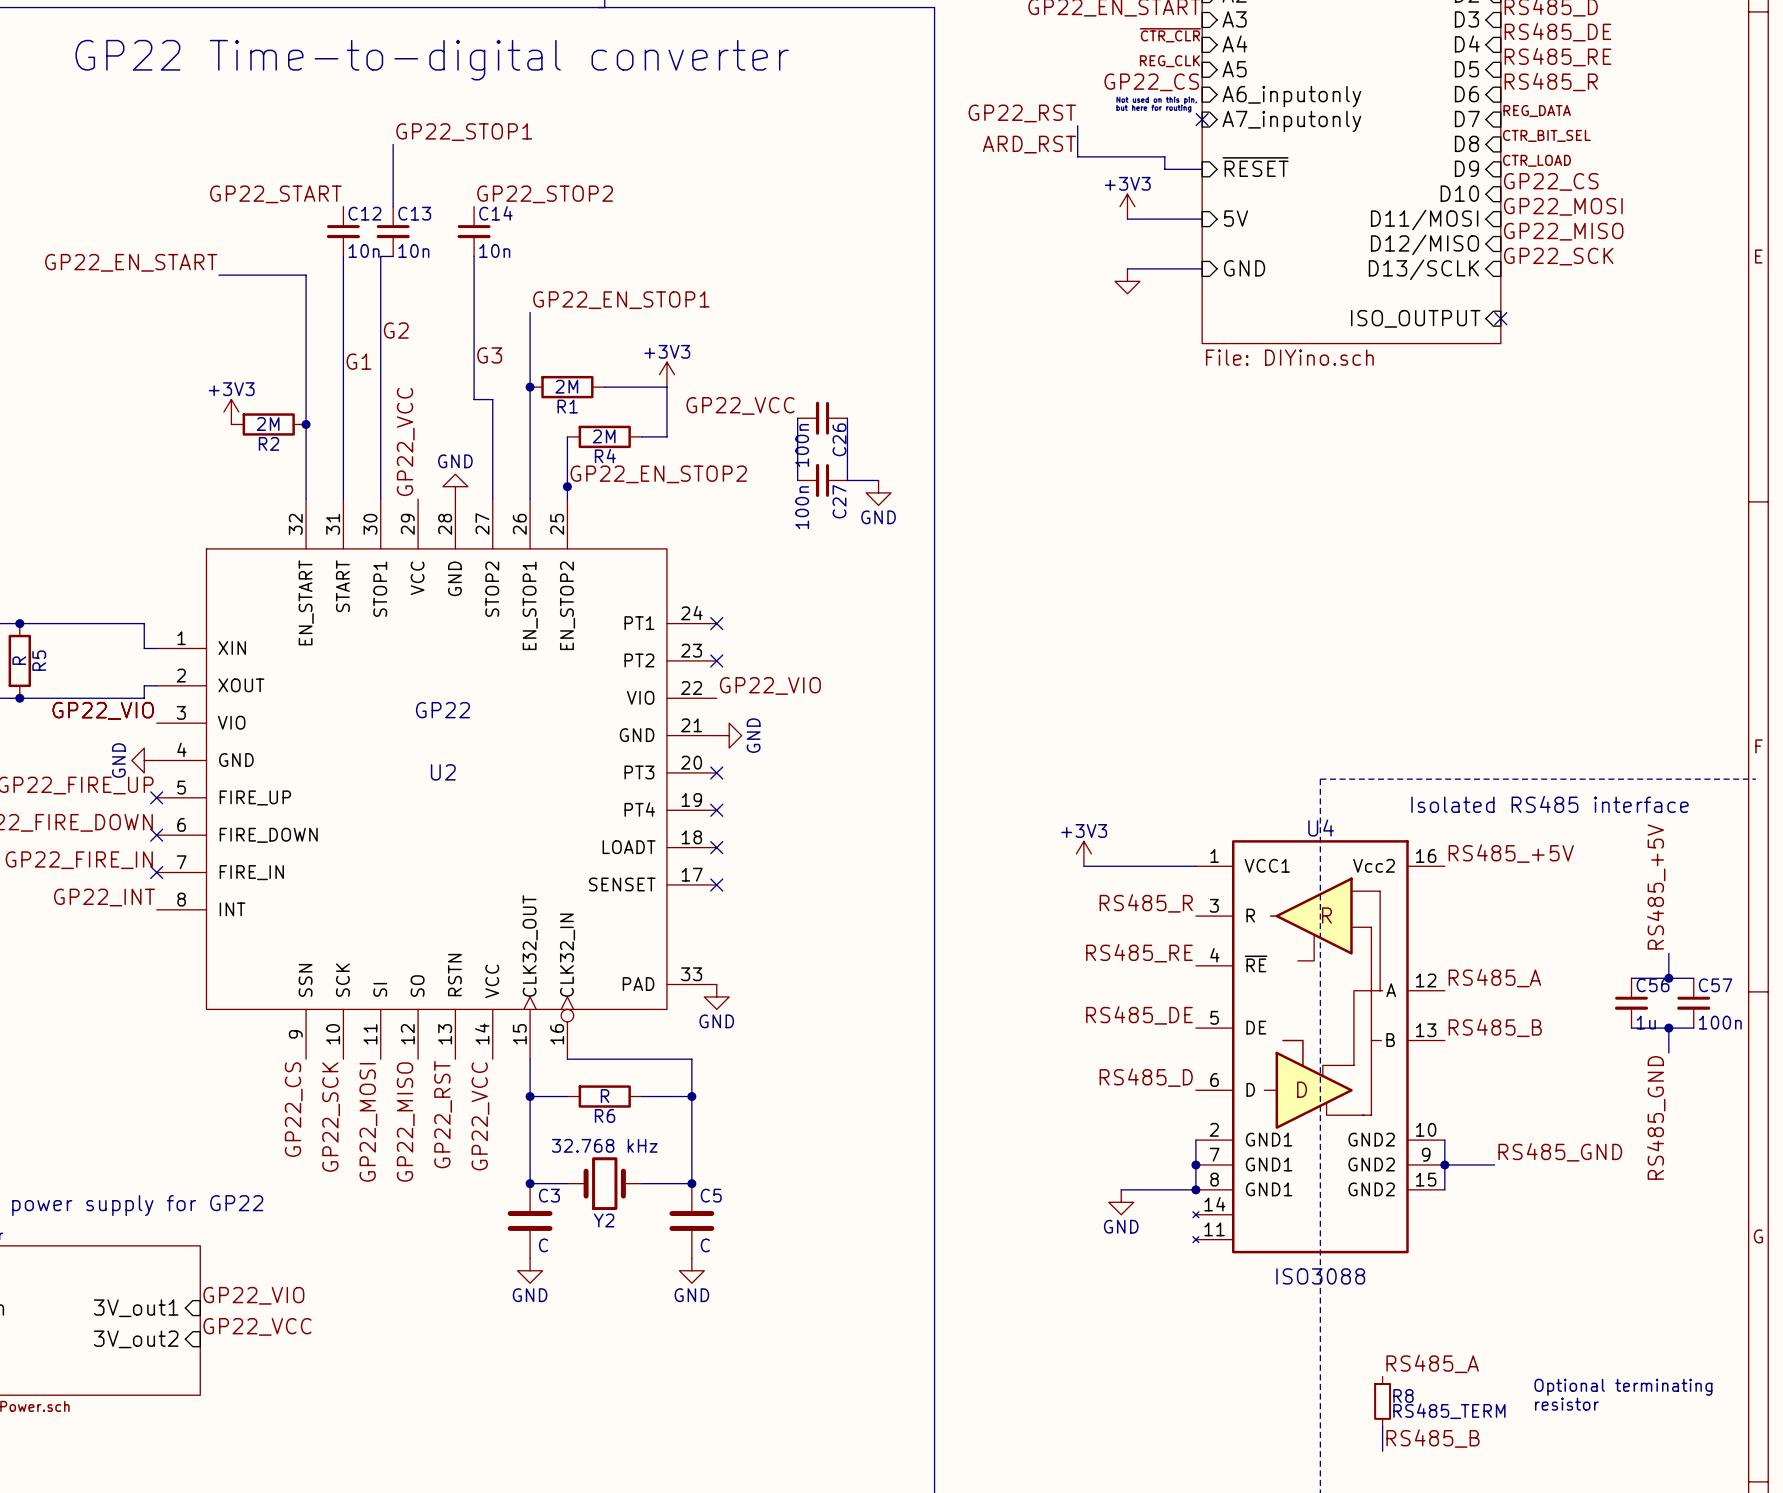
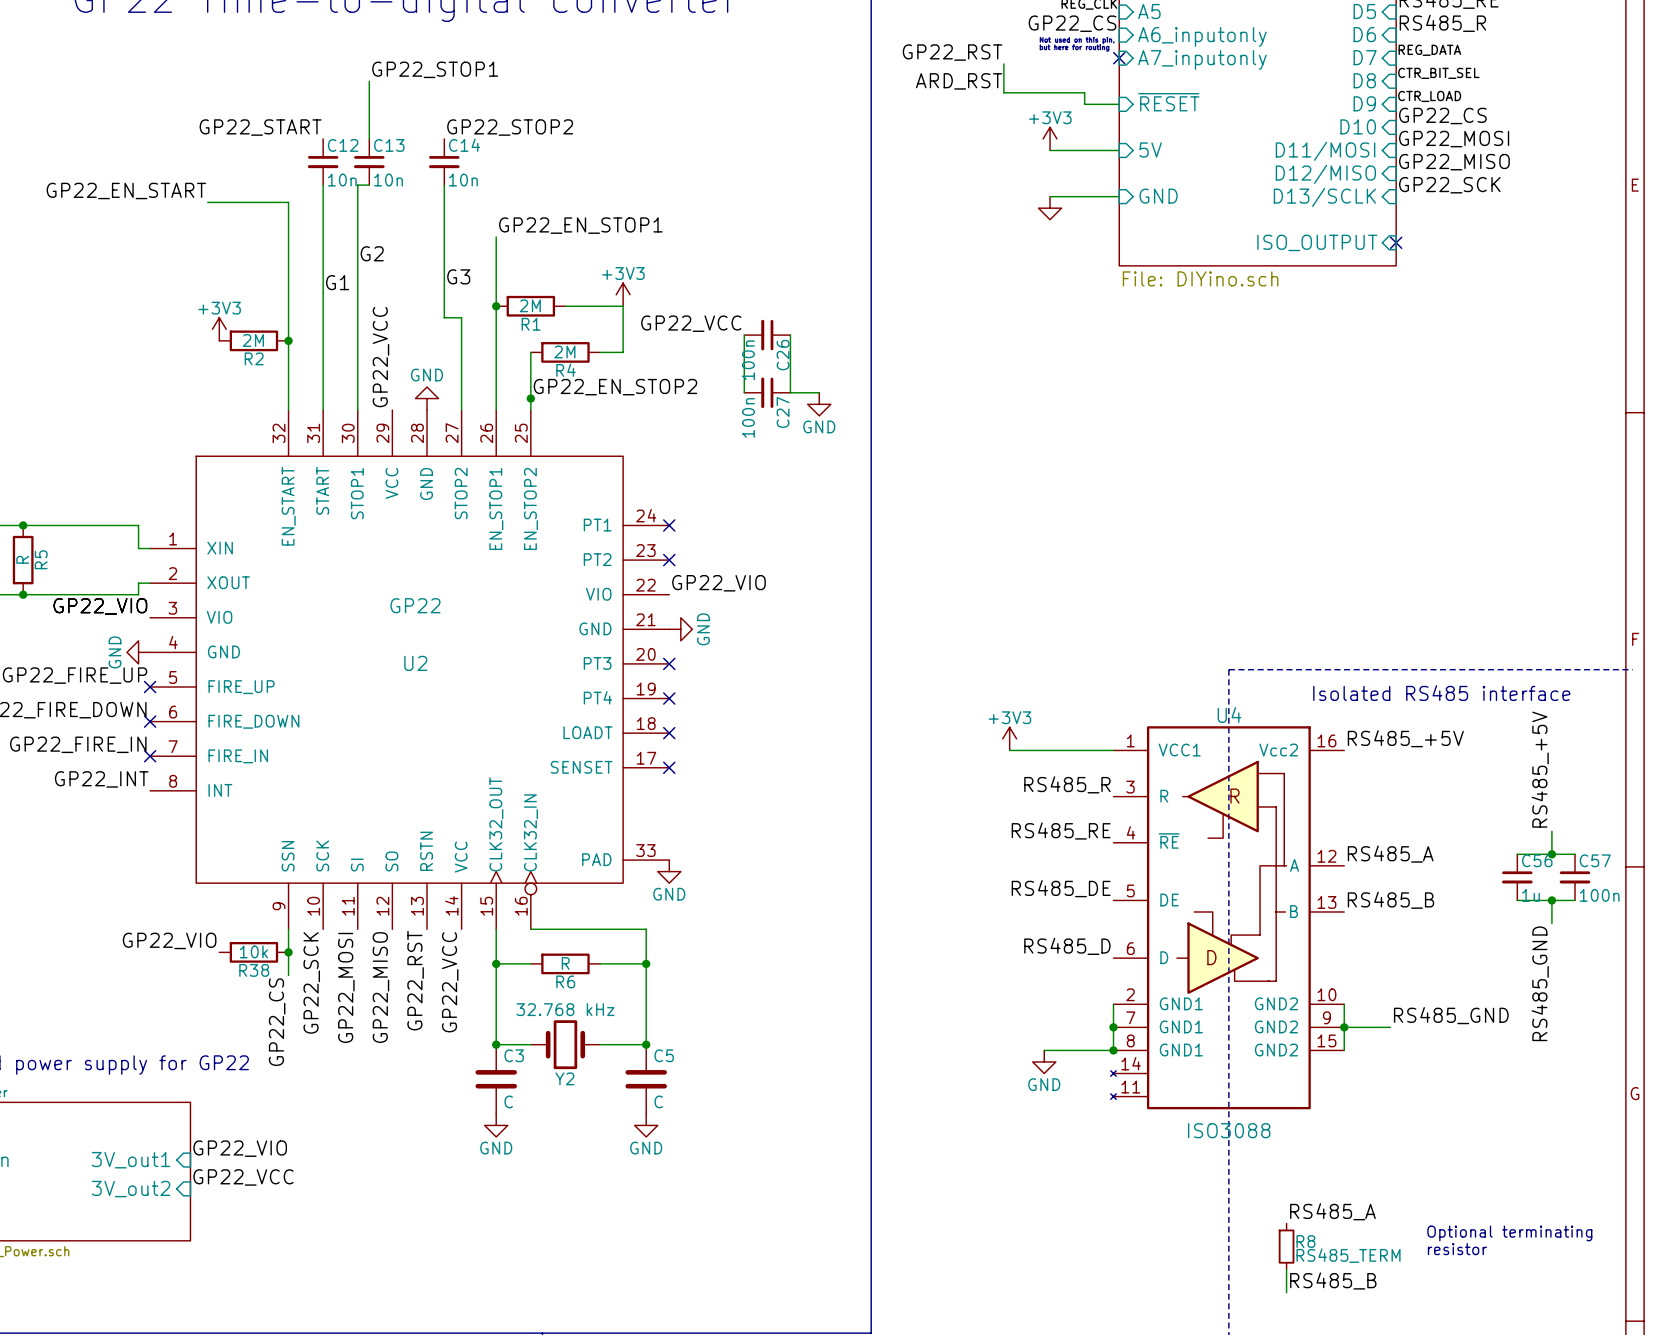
wire: none -> (288, 929) (288, 975)
label: none -> GP22_VIO (169, 940)
R38: none -> 10k (253, 952)
junction: none -> (288, 952)
label position: GP22_CS (293, 1109) -> GP22_CS (277, 1022)

